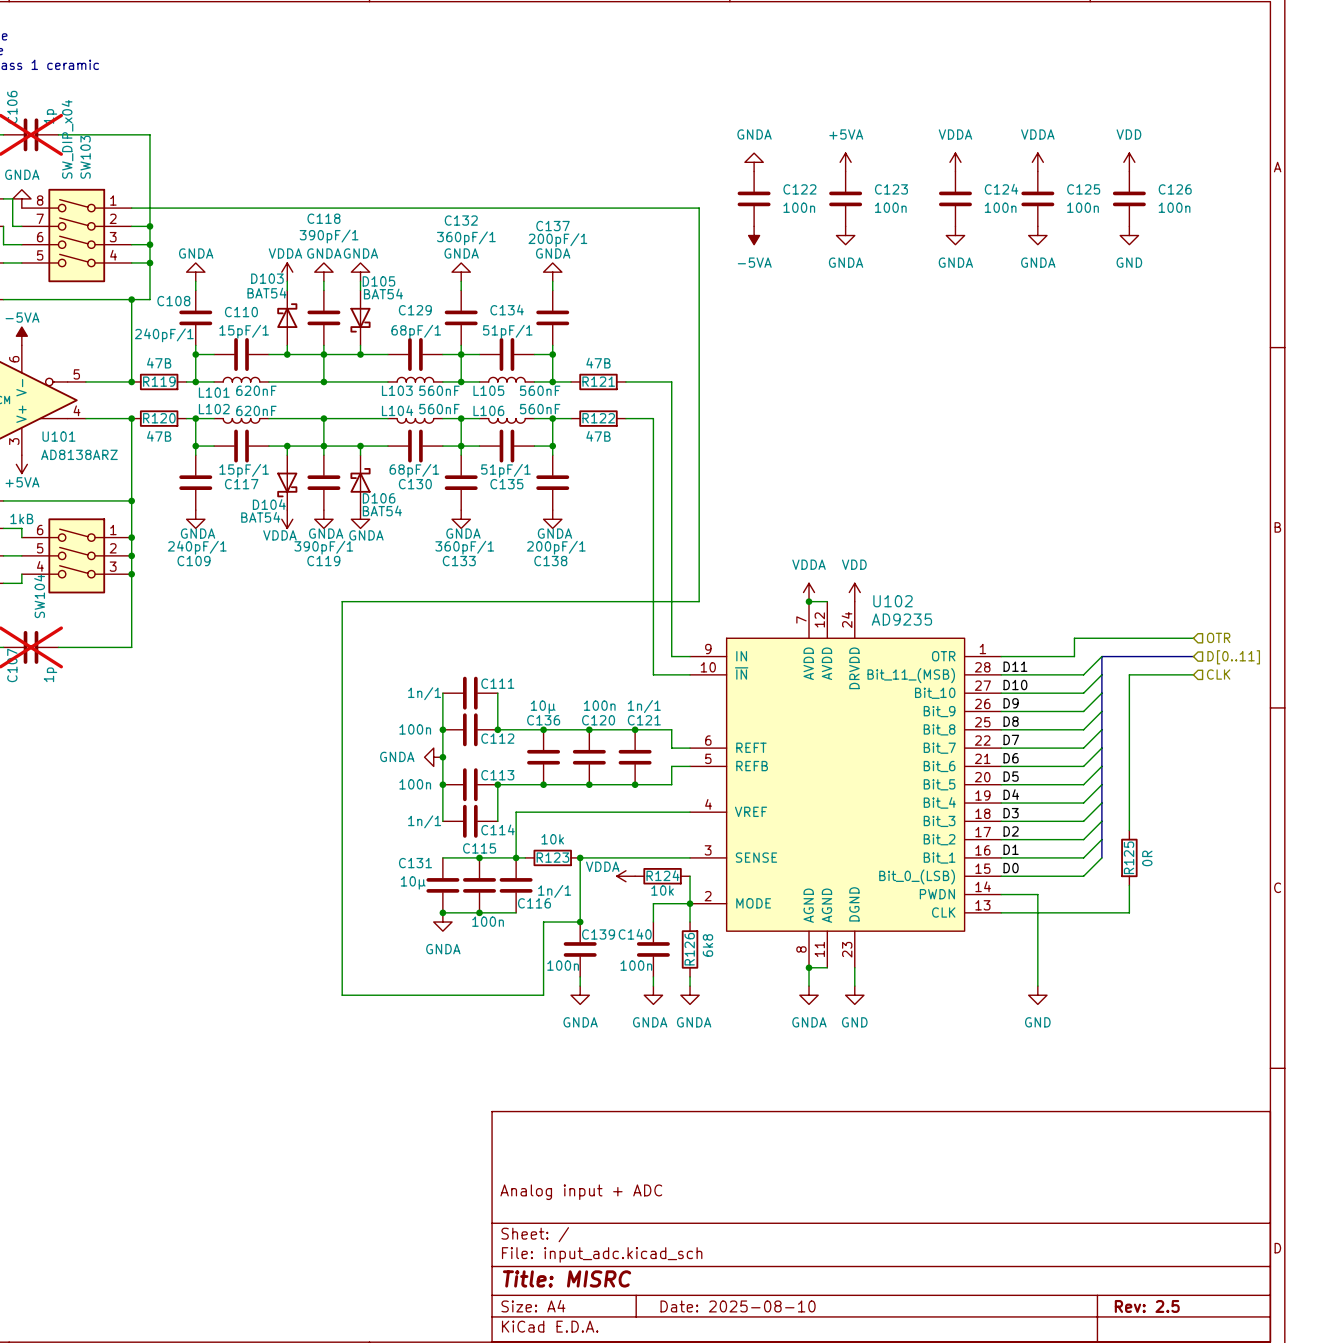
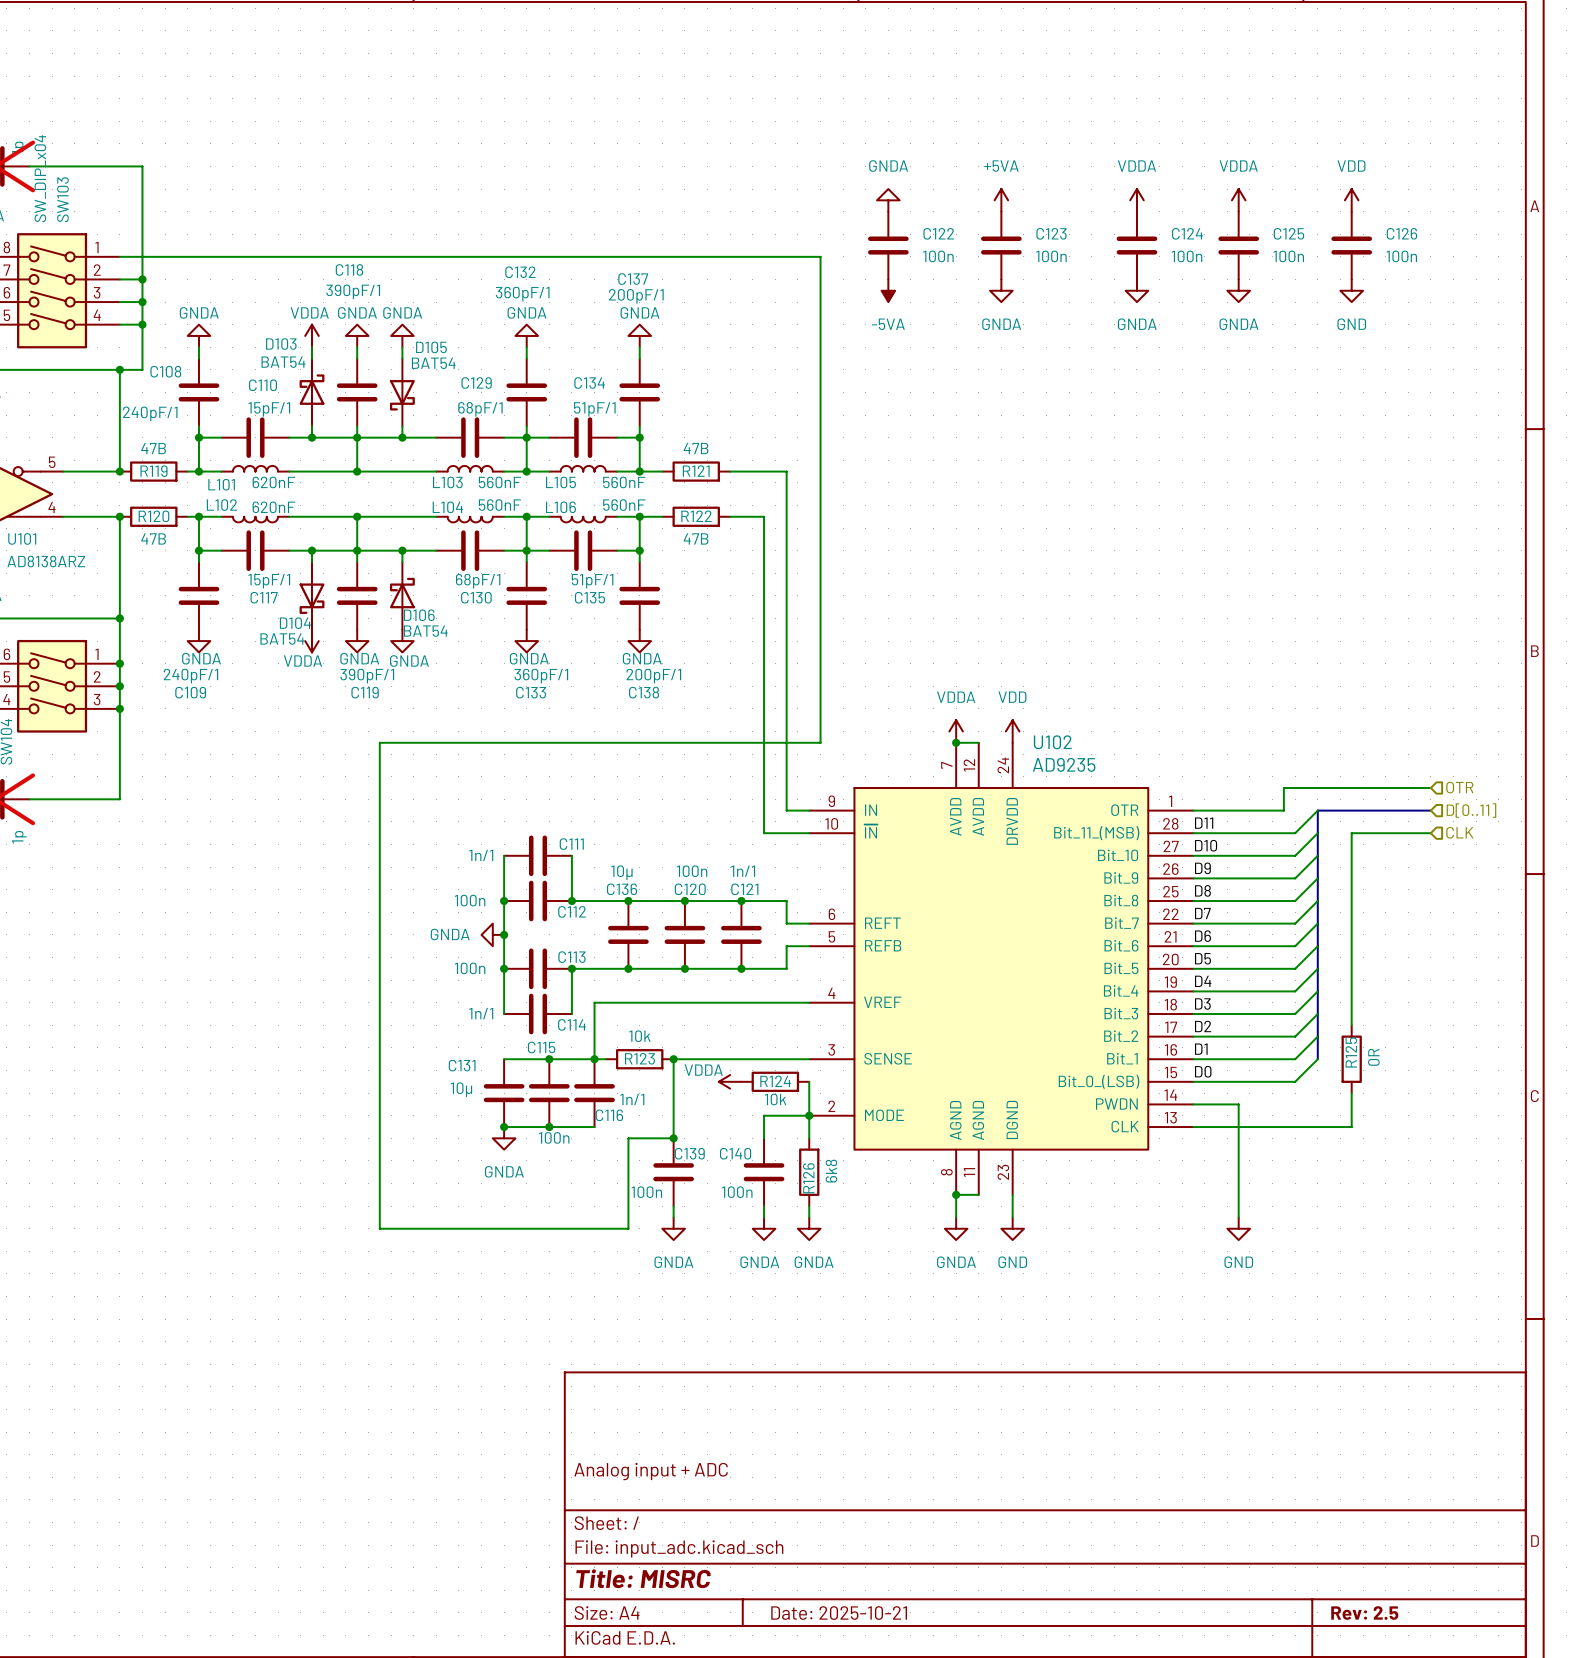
title block: Date: 2025-08-10 (738, 1306) -> Date: 2025-10-21 (839, 1613)

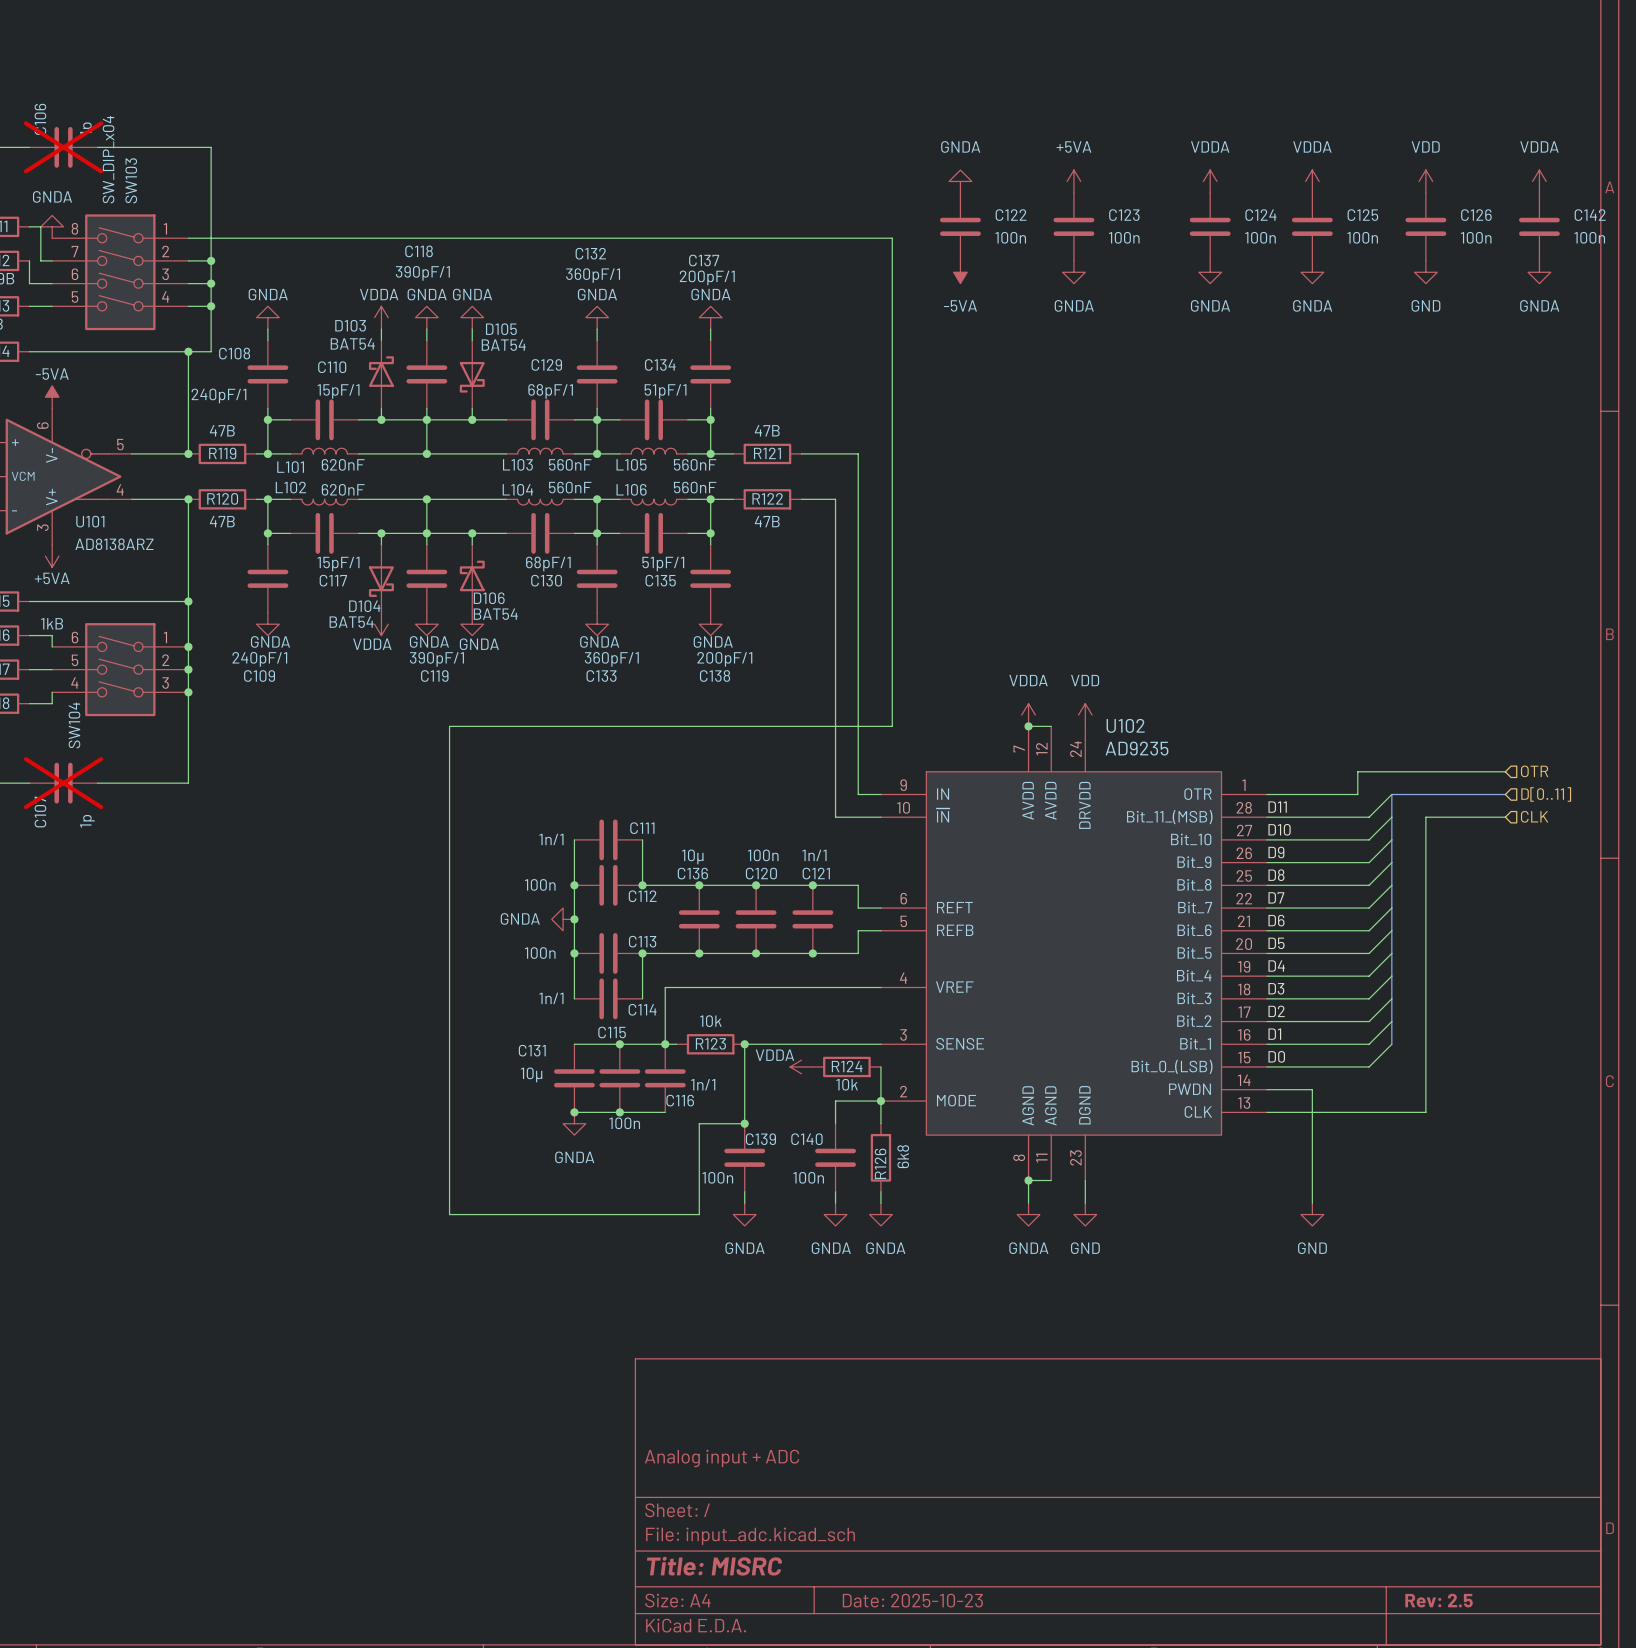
power symbol: none -> VDDA (1539, 181)
C142: none -> 100n (1539, 226)
power symbol: none -> GNDA (1539, 272)
wire: none -> (1425, 1010) (1425, 1078)
R125: 0R (1351, 1059) -> none
title block: Date: 2025-10-21 (839, 1613) -> Date: 2025-10-23 (912, 1600)

